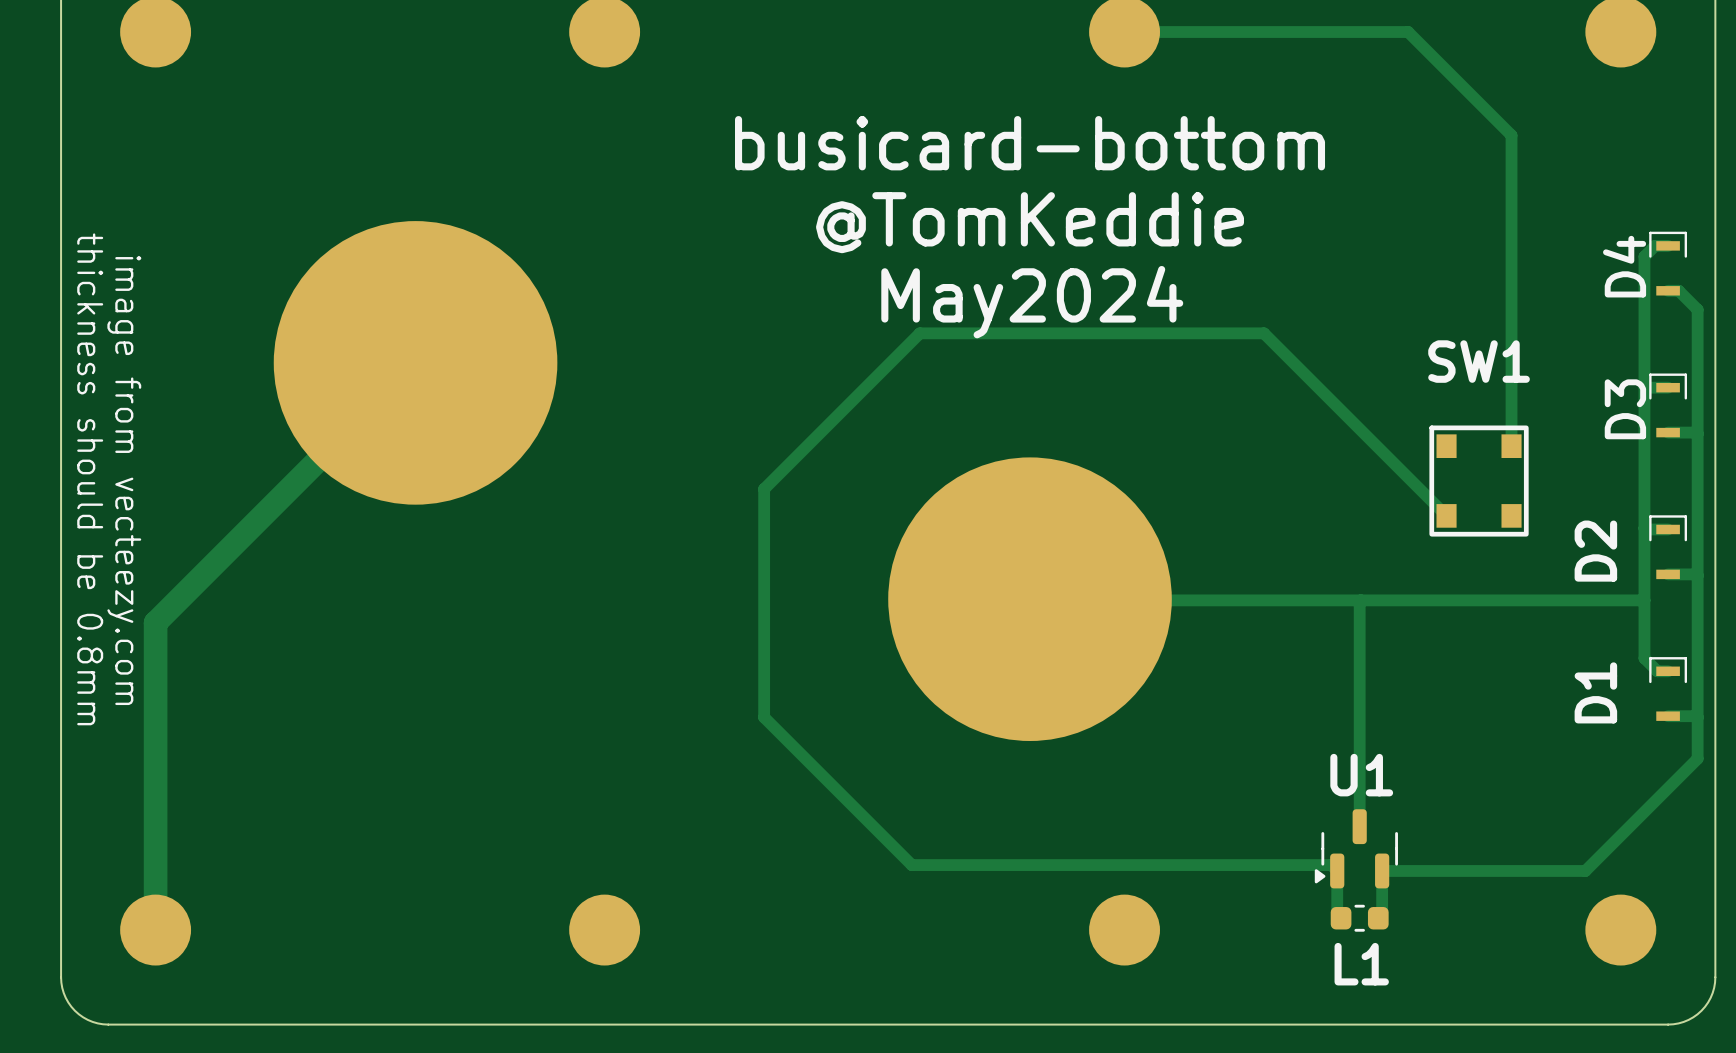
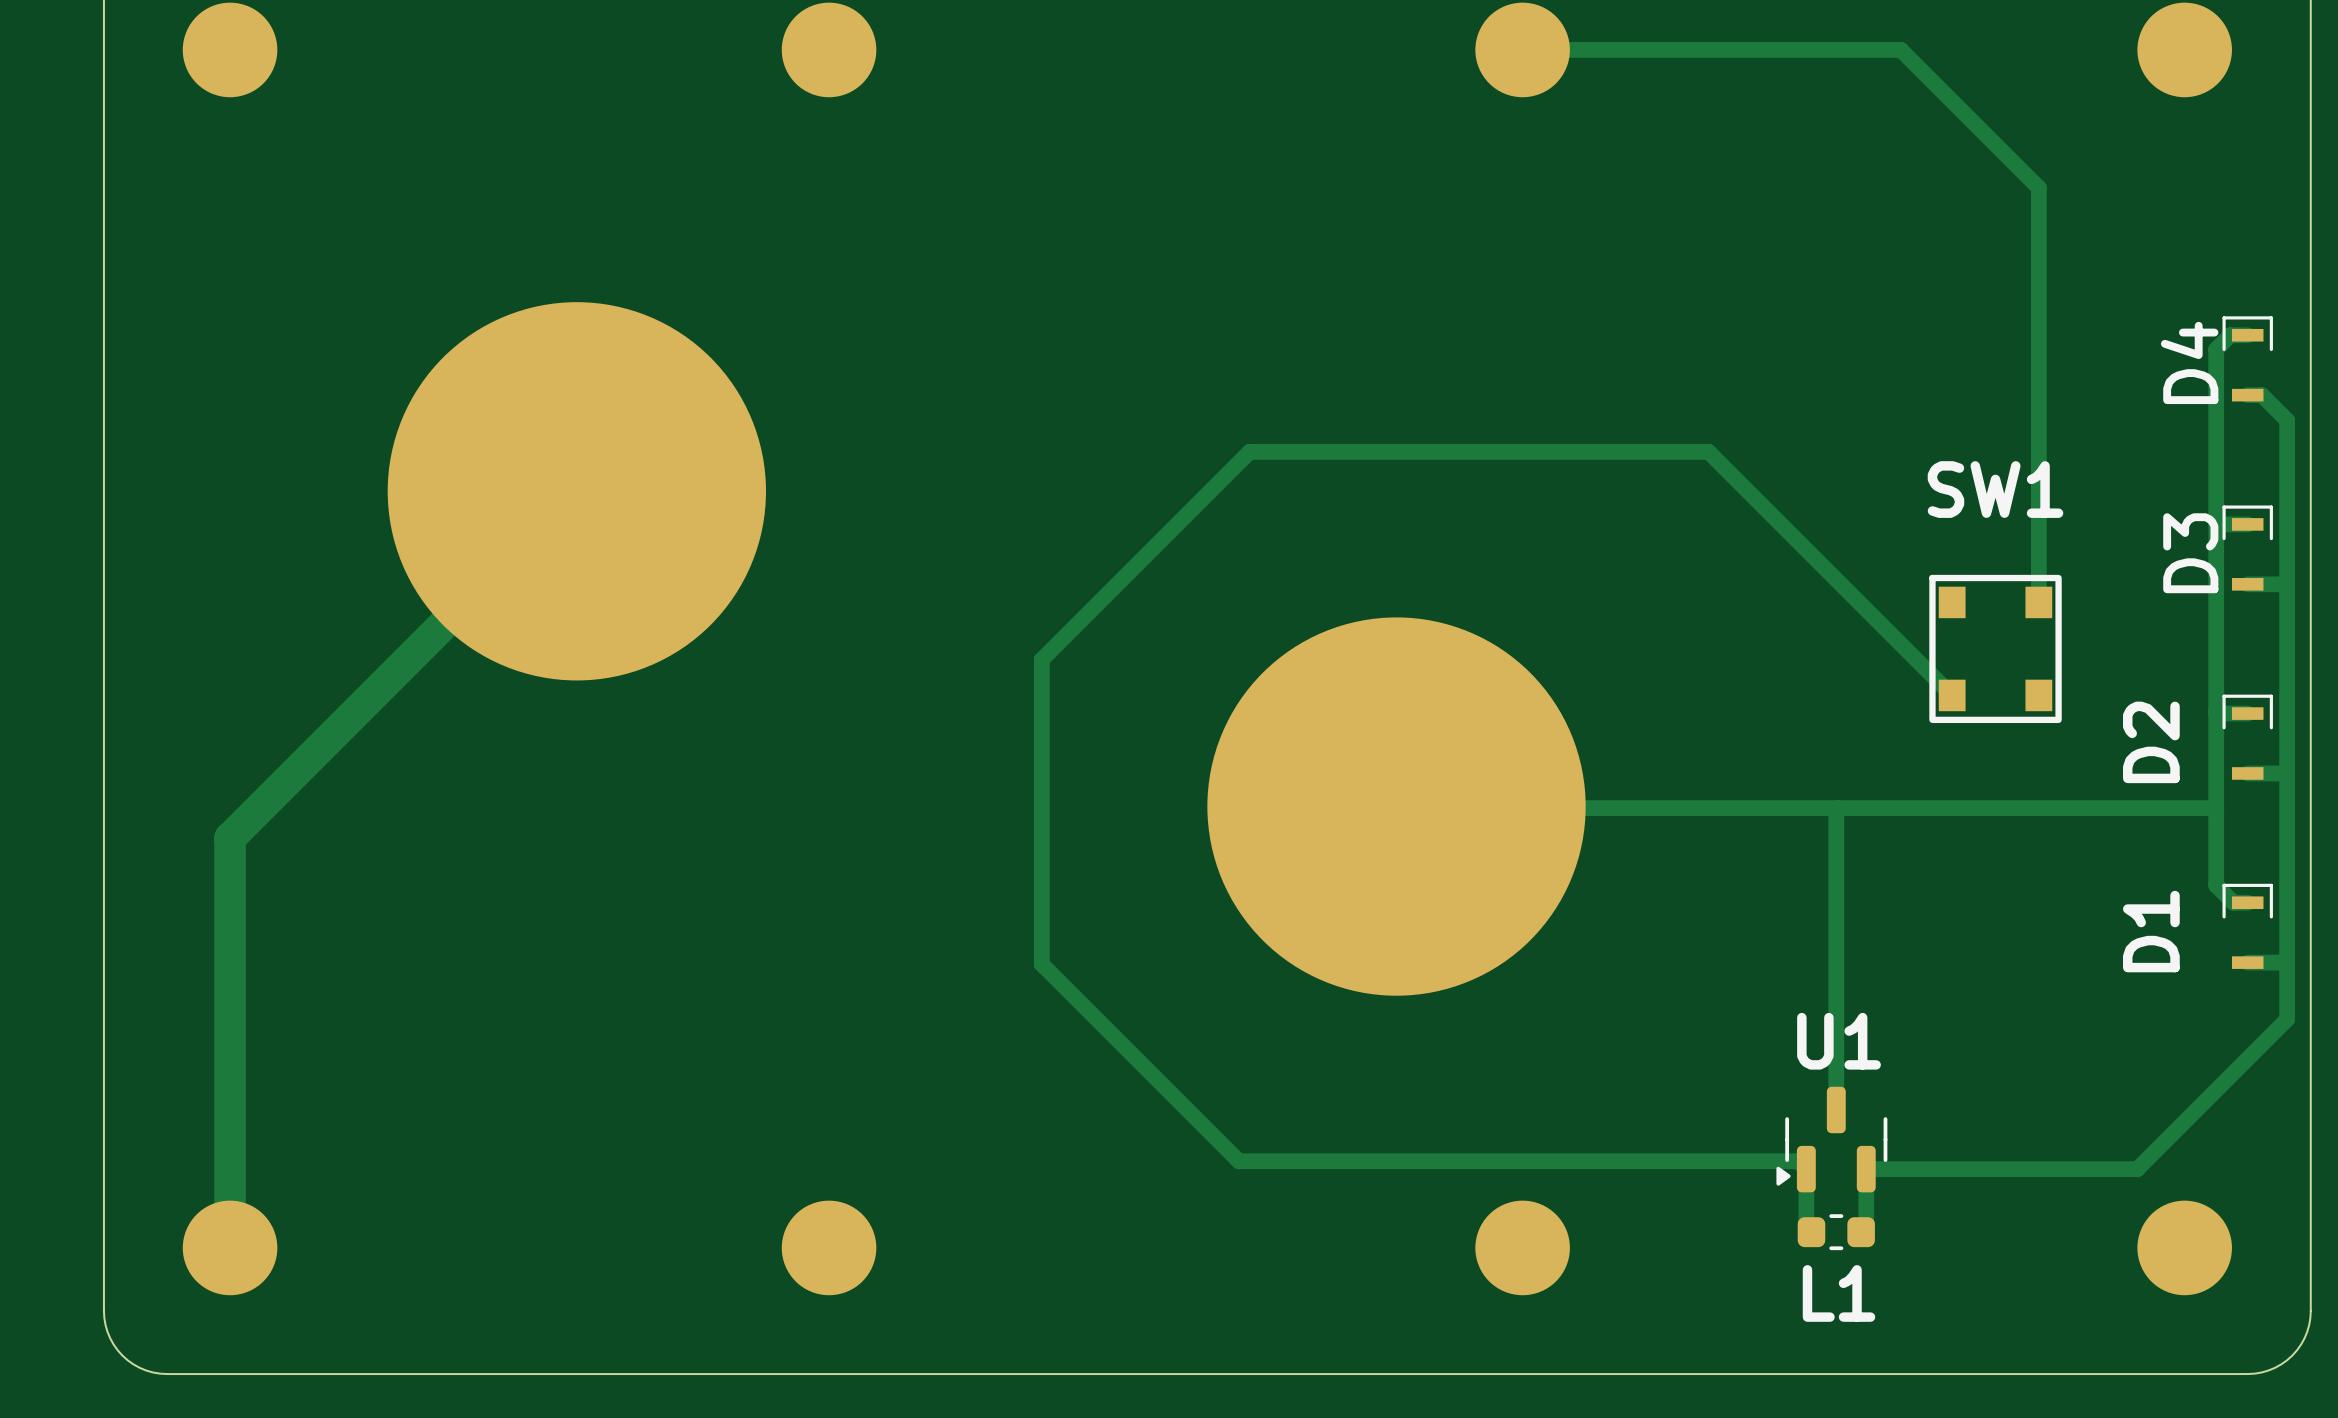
text: busicard-bottom (1030, 143) -> none
text: @TomKeddie (1030, 222) -> none
text: May2024 (1032, 302) -> none
text: thickness should be 0.8mm (90, 479) -> none
text: image from vecteezy.com (124, 480) -> none

